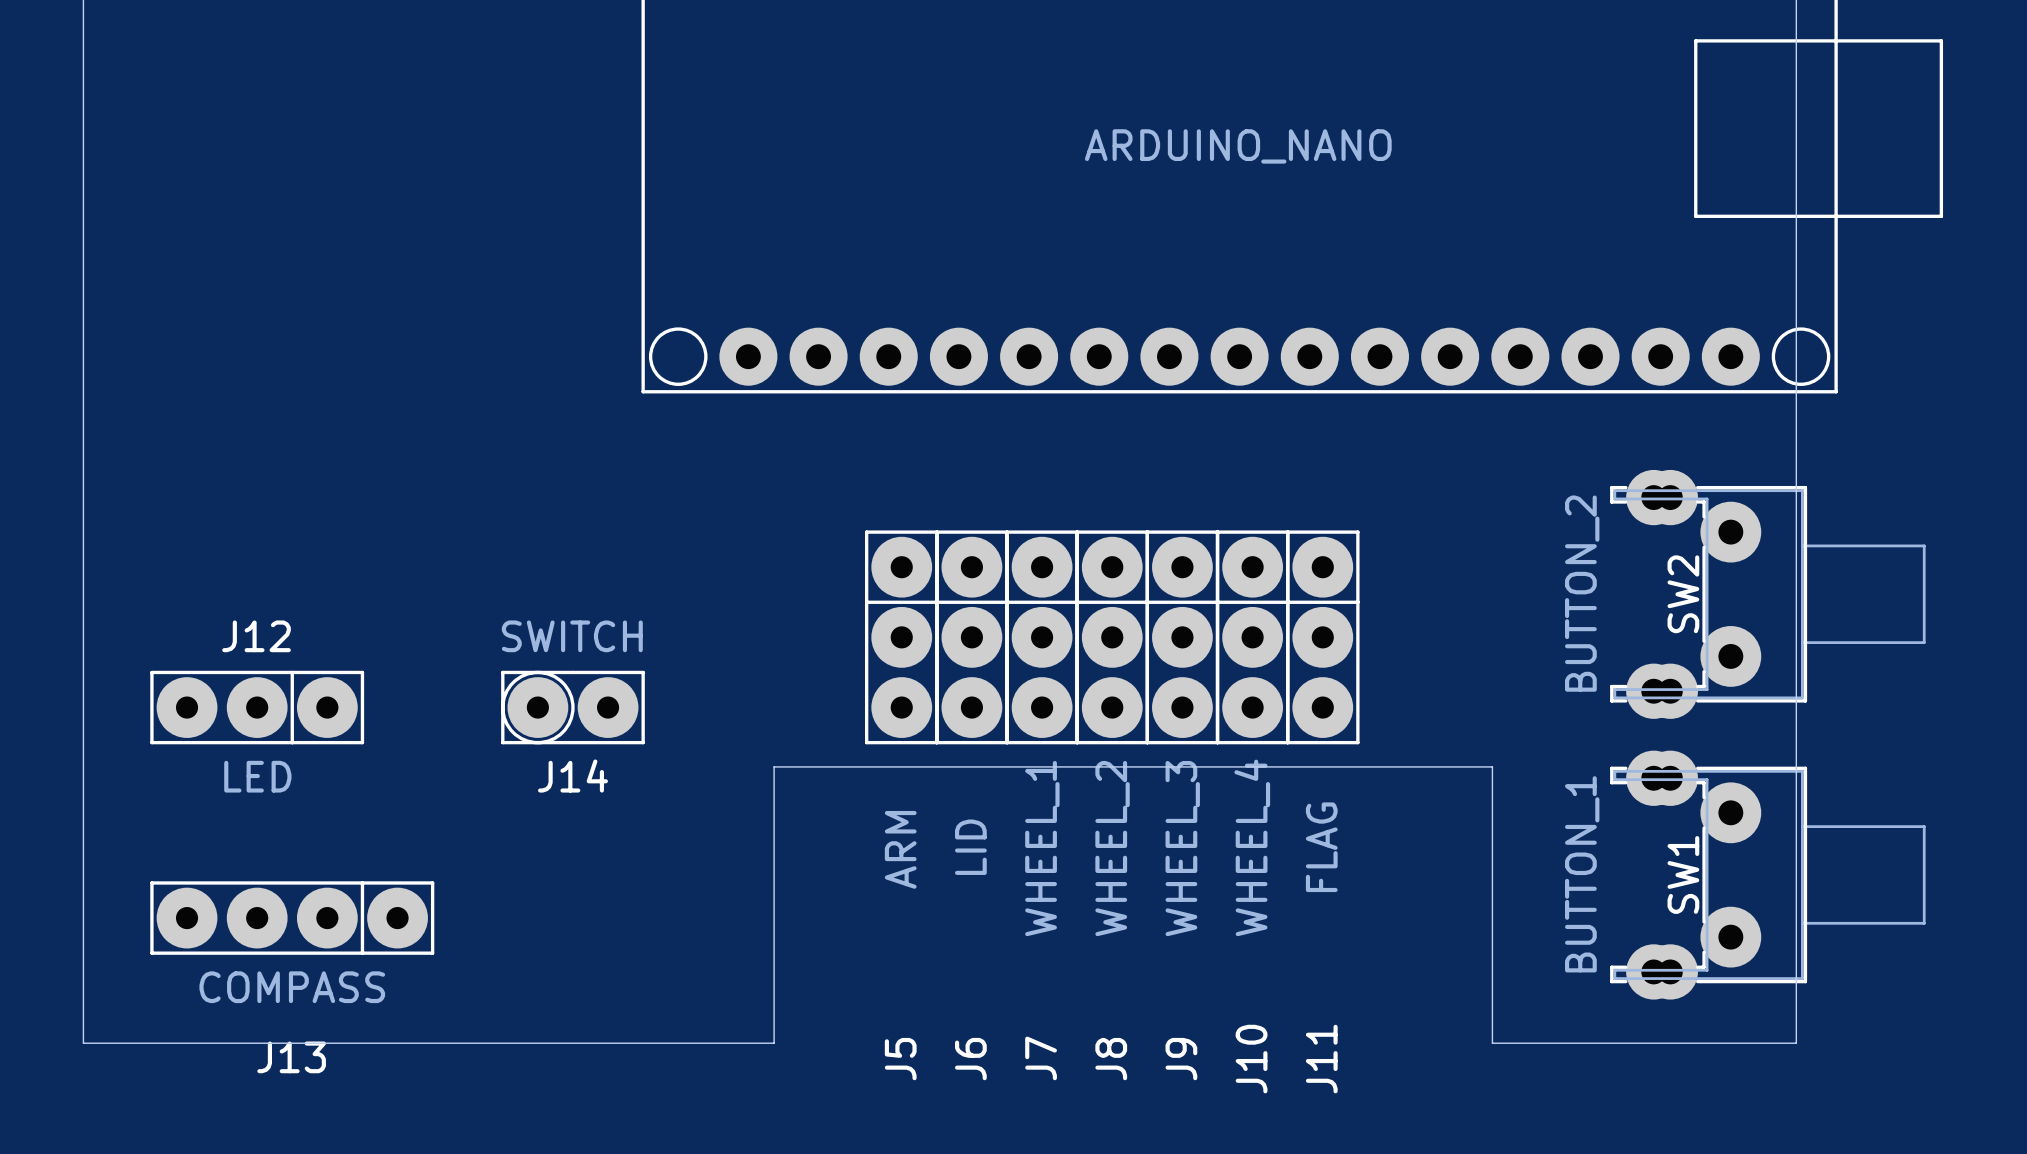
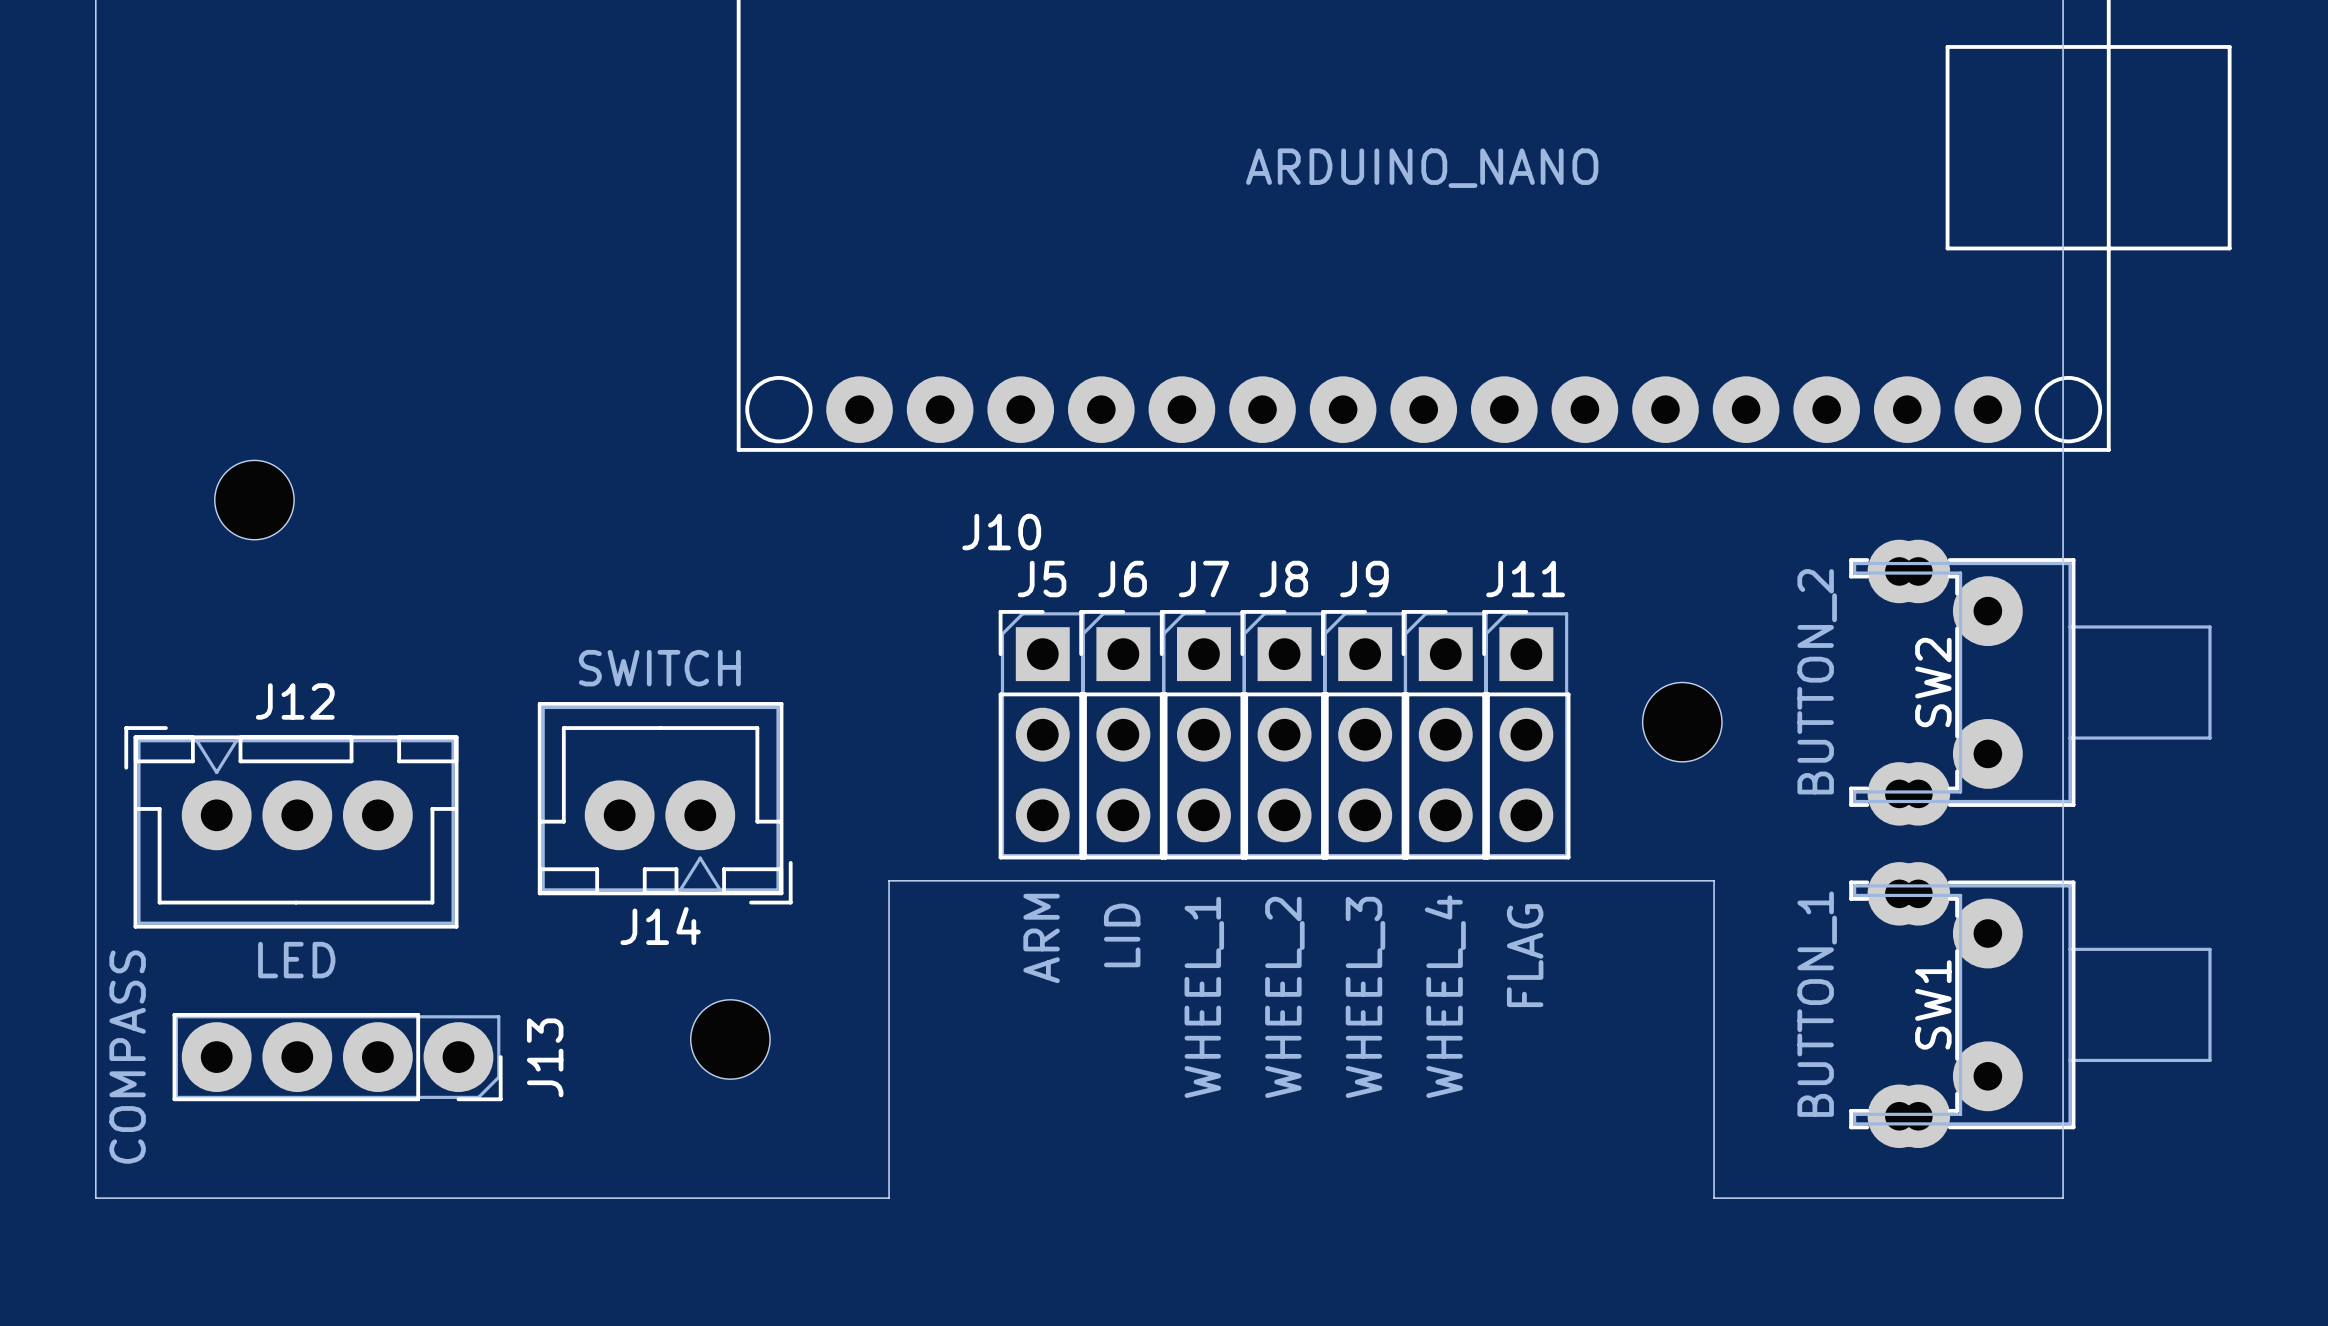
part: none -> (254, 500)
J5 footprint: [865, 530, 939, 745] -> [998, 610, 1087, 860]
J6 footprint: [935, 530, 1009, 745] -> [1079, 610, 1168, 860]
J7 footprint: [1005, 530, 1079, 745] -> [1159, 610, 1249, 860]
J8 footprint: [1075, 530, 1150, 745] -> [1240, 610, 1329, 860]
J9 footprint: [1145, 530, 1220, 745] -> [1321, 610, 1410, 860]
J10 footprint: [1215, 530, 1290, 745] -> [1401, 610, 1490, 860]
J11 footprint: [1286, 530, 1360, 745] -> [1482, 610, 1571, 860]
part: none -> (1682, 722)
J12 footprint: [150, 670, 365, 745] -> [124, 726, 459, 929]
J14 footprint: [501, 670, 645, 745] -> [537, 702, 793, 905]
J13 footprint: [150, 881, 435, 955] -> [172, 1012, 503, 1102]
part: none -> (730, 1039)
J13 value position: COMPASS (292, 987) -> COMPASS (127, 1057)
J13 name position: J13 (291, 1057) -> J13 (545, 1057)
J7 name position: J7 (1041, 1058) -> J7 (1203, 579)
J5 name position: J5 (900, 1059) -> J5 (1042, 579)
J6 name position: J6 (970, 1059) -> J6 (1122, 579)
J8 name position: J8 (1111, 1059) -> J8 (1283, 579)
J9 name position: J9 (1181, 1059) -> J9 (1364, 579)
J10 name position: J10 (1251, 1059) -> J10 (1001, 532)
J11 name position: J11 (1321, 1059) -> J11 (1525, 579)

